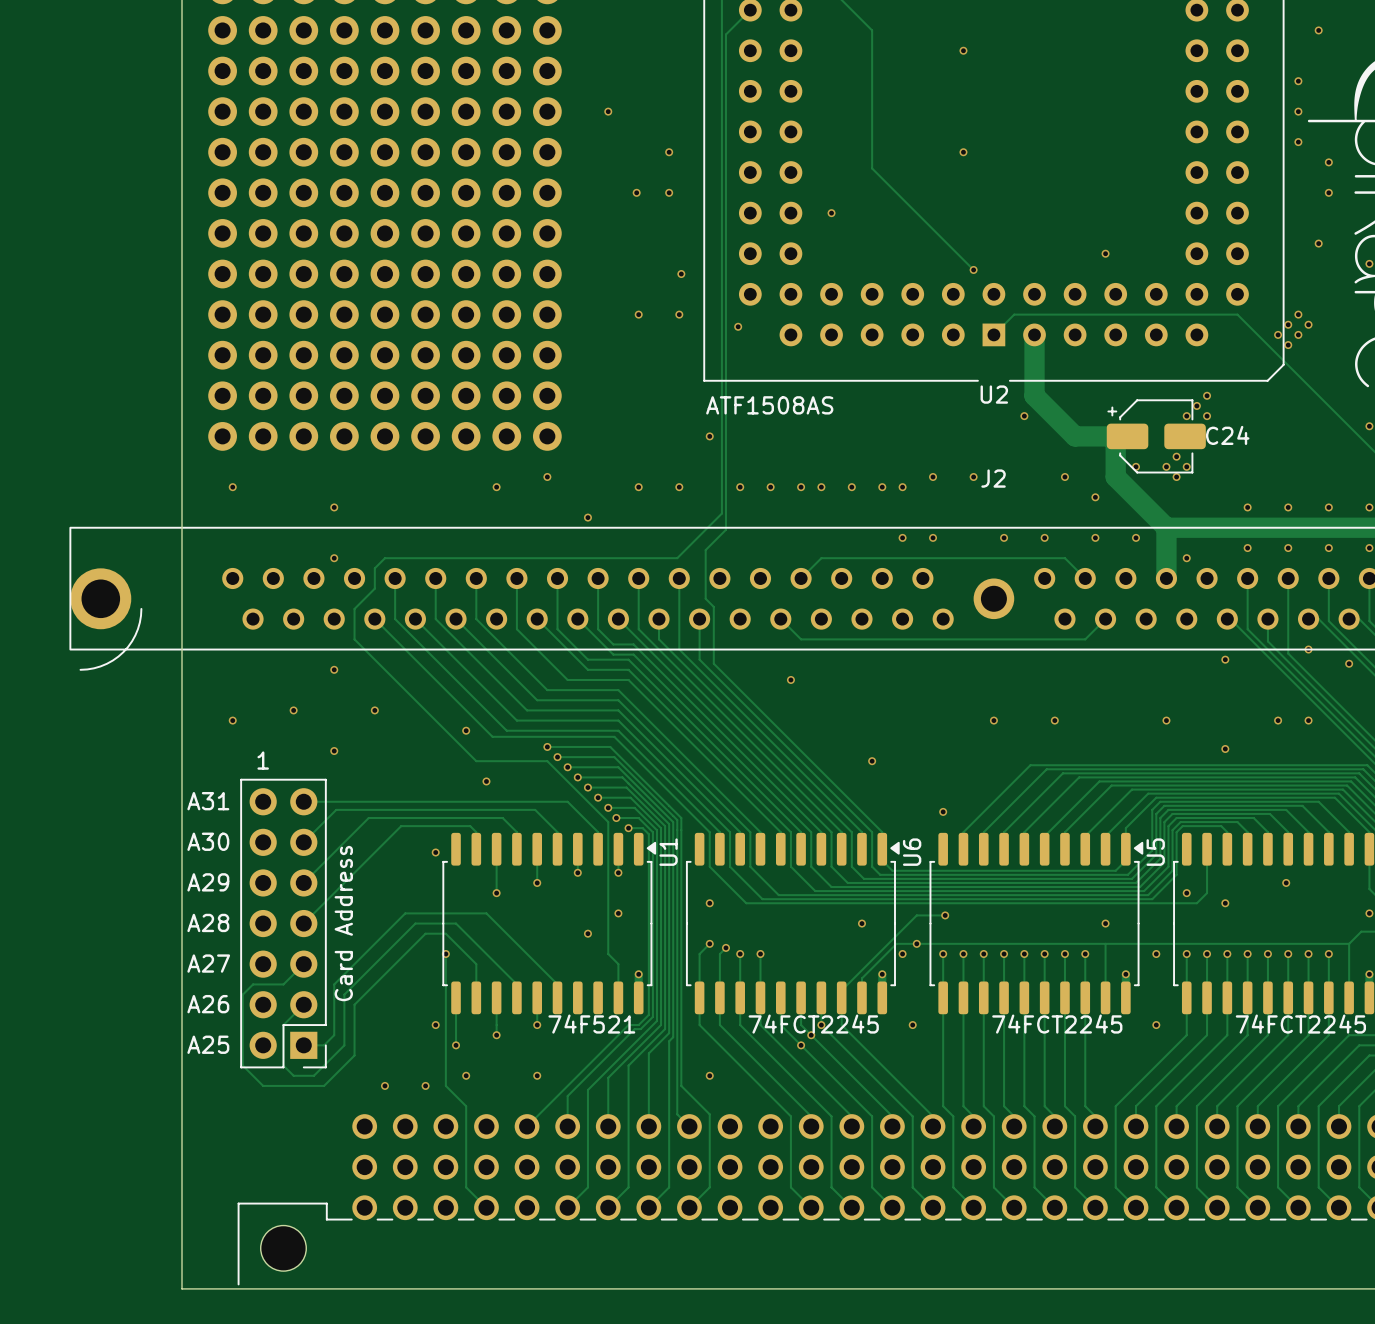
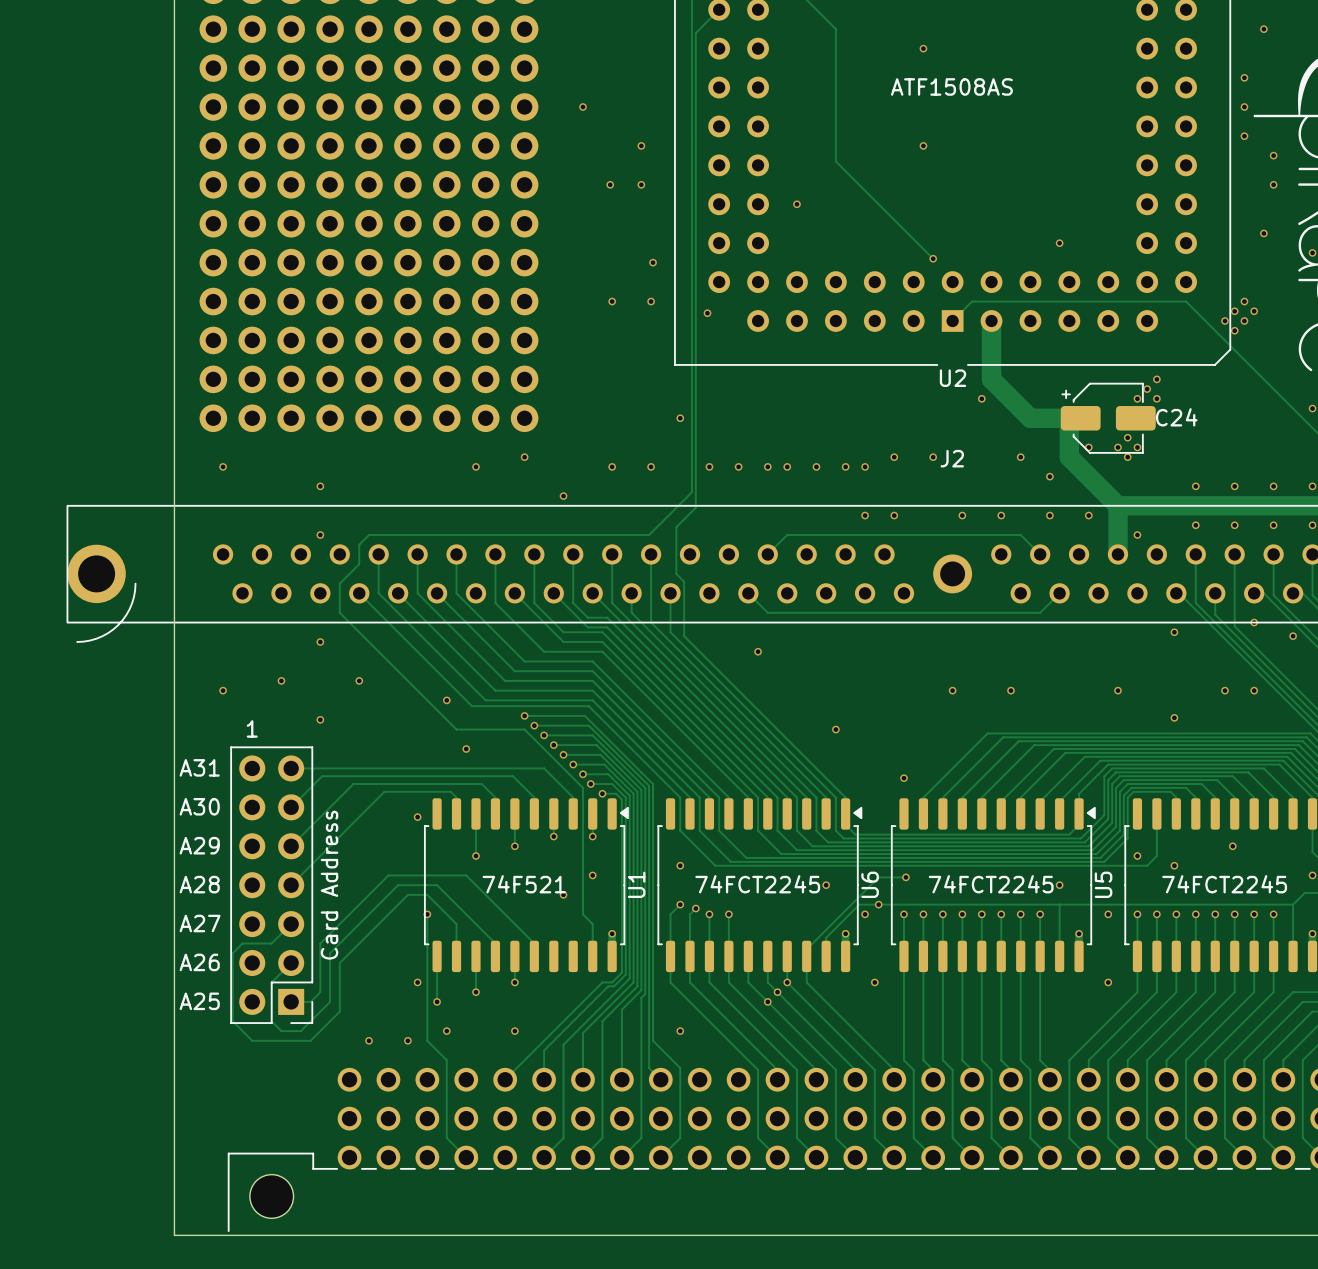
U2 value position: ATF1508AS (769, 405) -> ATF1508AS (951, 86)
U1 name position: U1 (668, 852) -> U1 (636, 884)
U6 name position: U6 (912, 852) -> U6 (870, 884)
U5 name position: U5 (1155, 852) -> U5 (1103, 884)
U1 value position: 74F521 (591, 1024) -> 74F521 (524, 884)
U6 value position: 74FCT2245 (813, 1024) -> 74FCT2245 (757, 884)
U5 value position: 74FCT2245 (1057, 1024) -> 74FCT2245 (991, 884)
part value position: 74FCT2245 (1300, 1024) -> 74FCT2245 (1224, 884)

